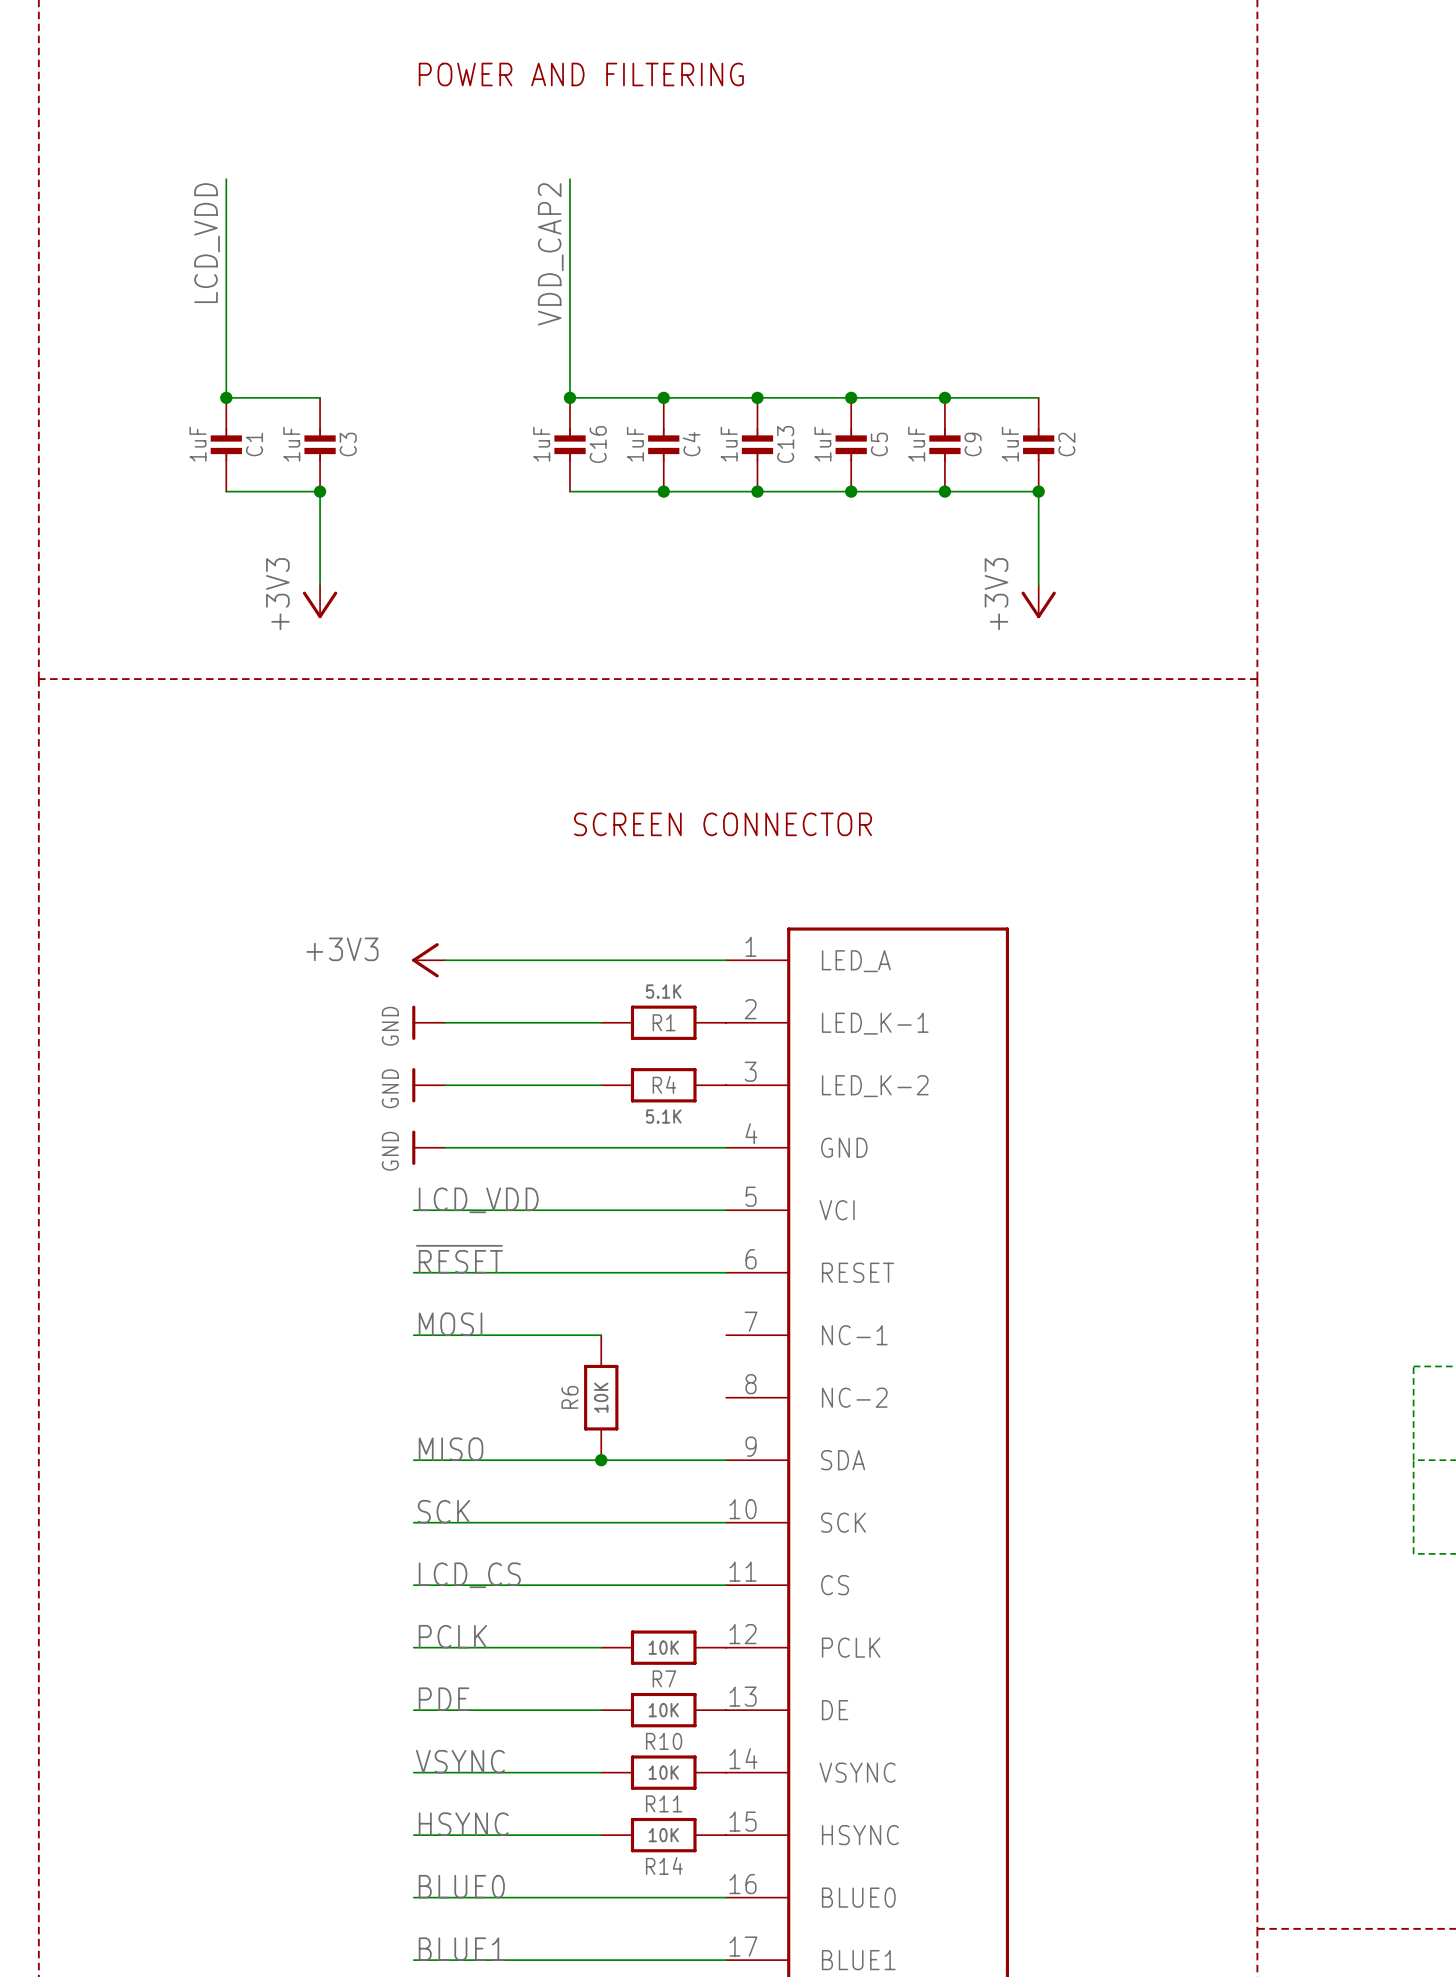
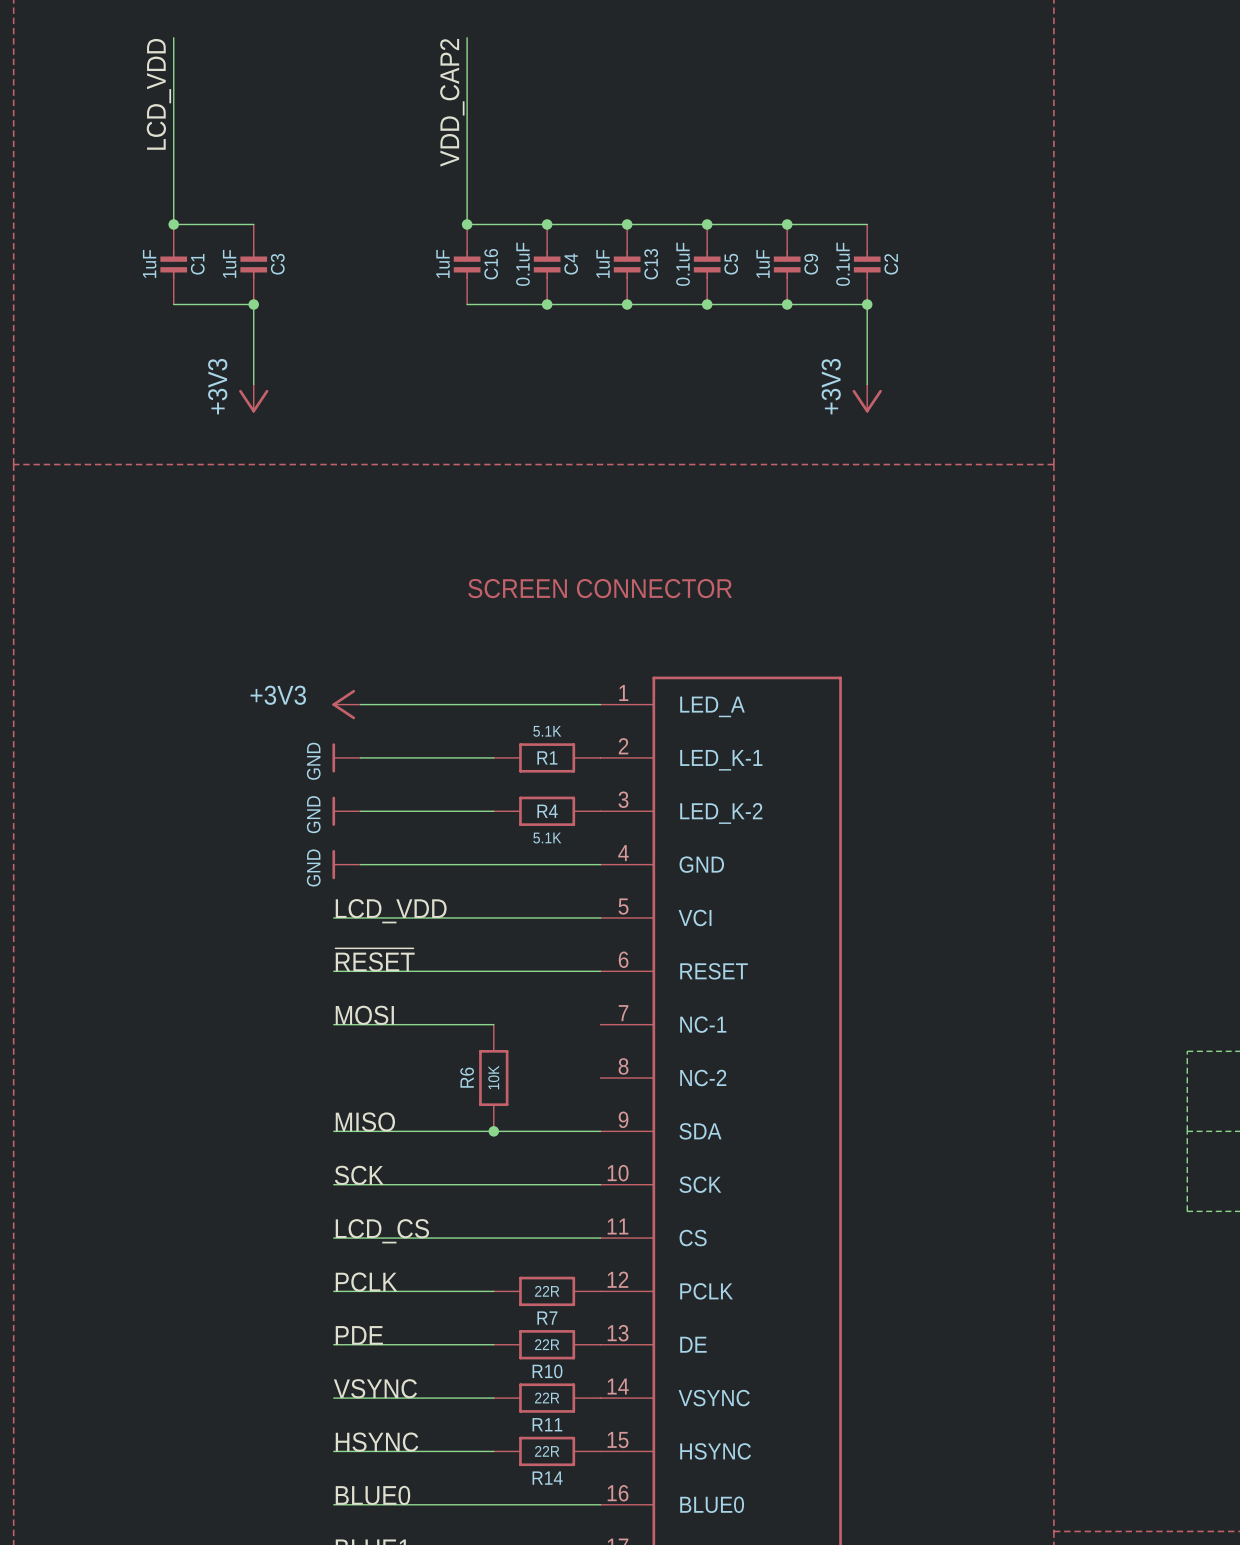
C4 value: 1uF (635, 444) -> 0.1uF (522, 264)
C5 value: 1uF (822, 444) -> 0.1uF (683, 264)
C2 value: 1uF (1010, 444) -> 0.1uF (843, 264)
R7 value: 10K (663, 1647) -> 22R (547, 1291)
R10 value: 10K (663, 1710) -> 22R (547, 1344)
R11 value: 10K (663, 1772) -> 22R (547, 1398)
R14 value: 10K (663, 1835) -> 22R (547, 1451)

